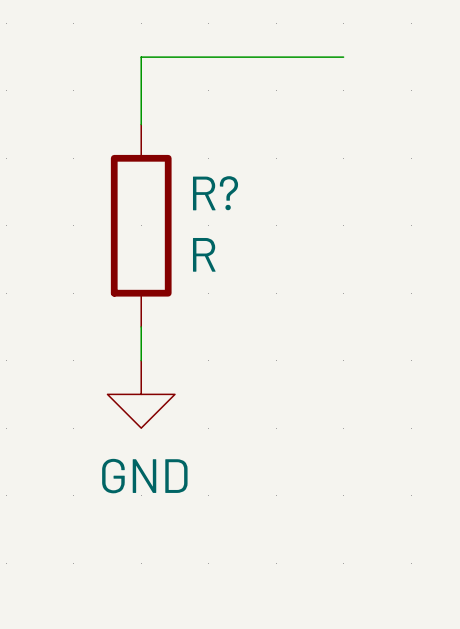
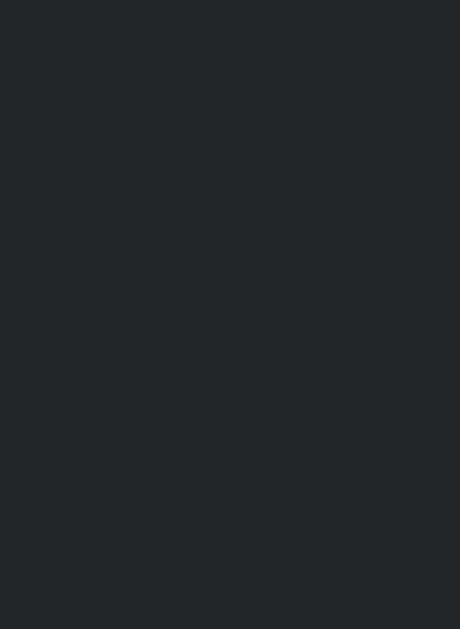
wire: (343, 57) (141, 57) (141, 124) -> none
R?: R (141, 225) -> none
wire: (141, 326) (141, 360) -> none
power symbol: GND (141, 394) -> none

